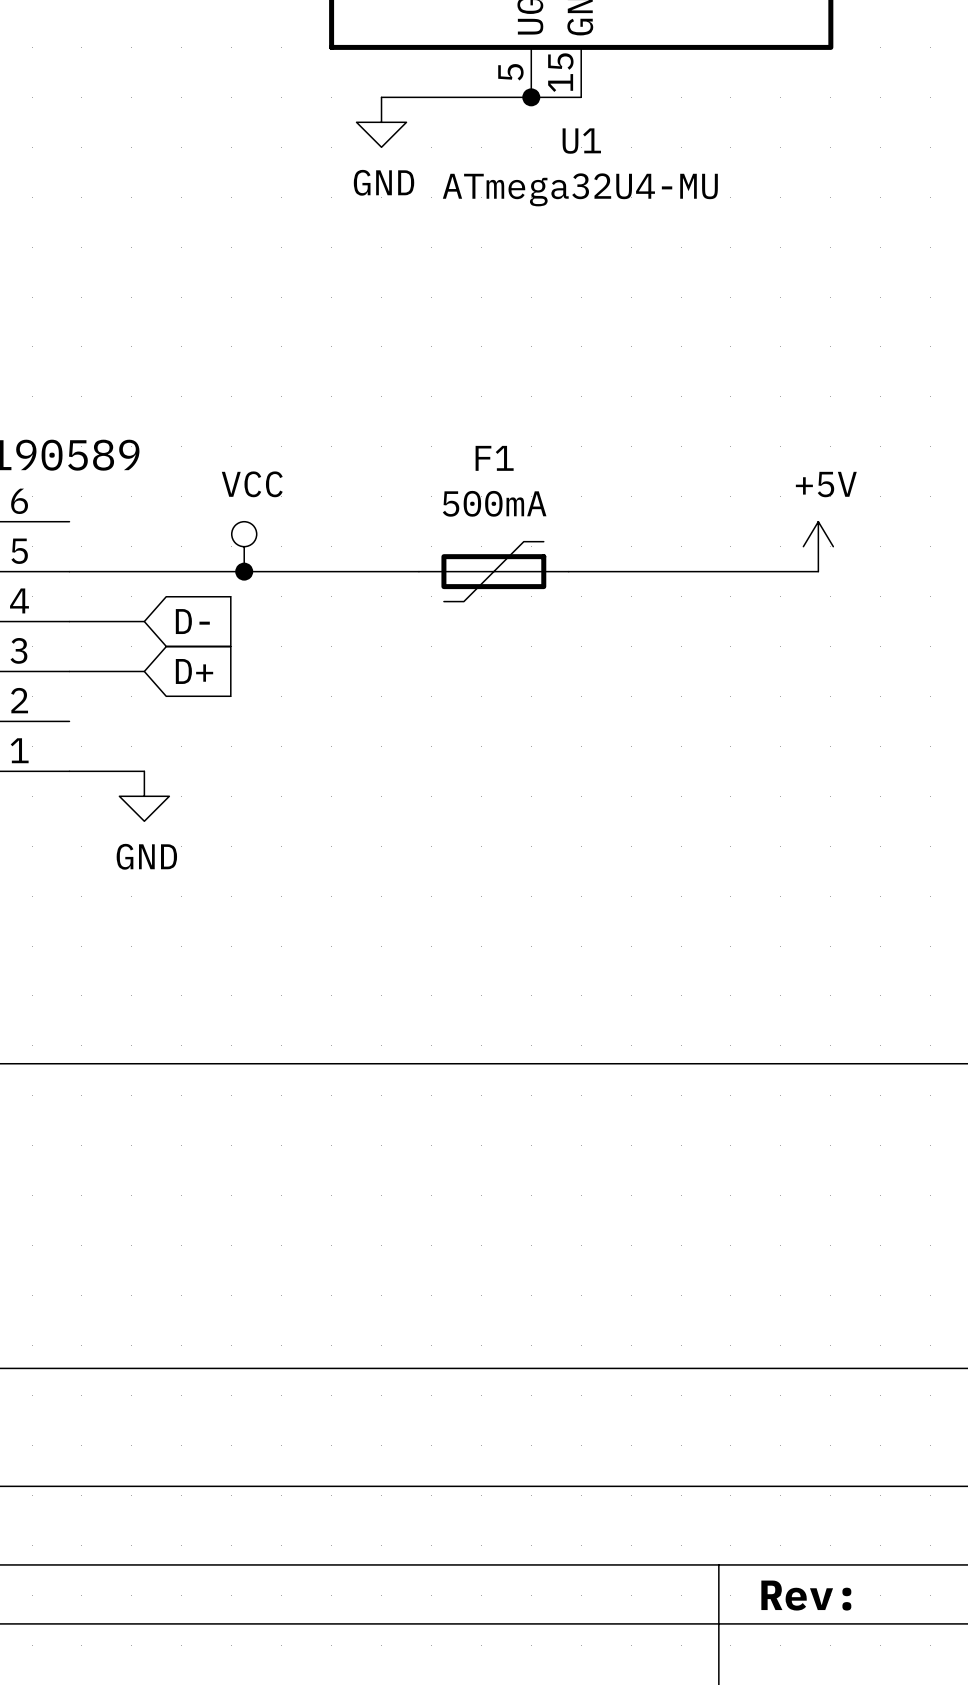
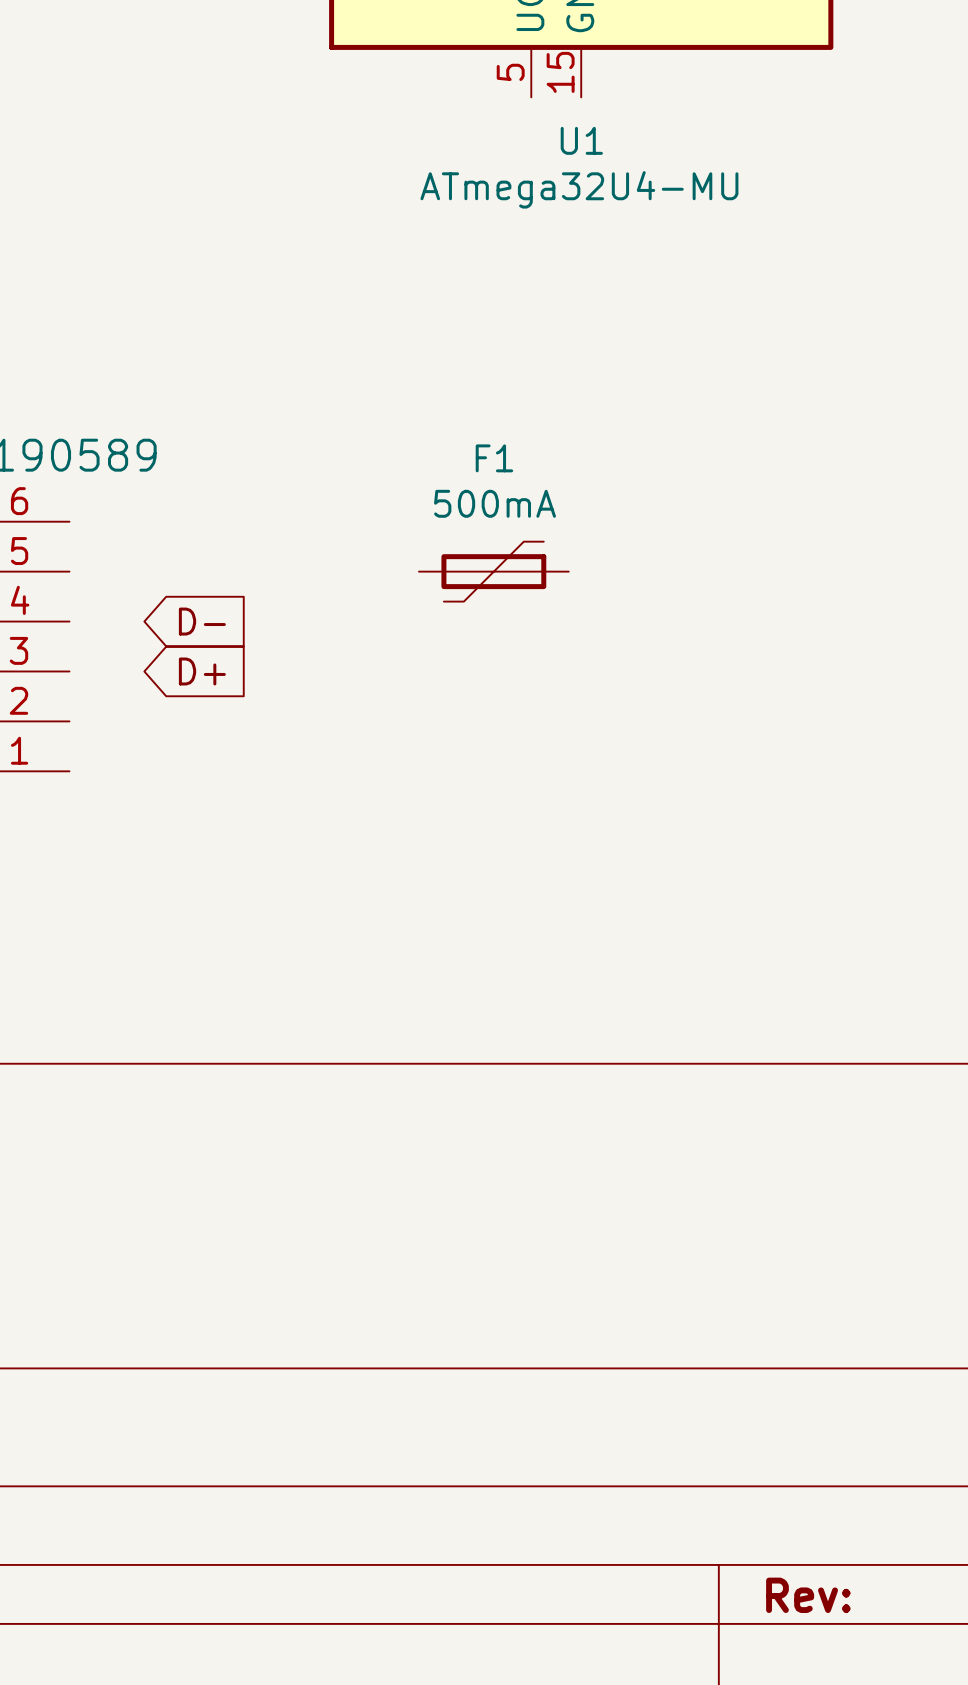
wire: (381, 97) (581, 97) -> none
junction: (531, 97) -> none
power symbol: GND (381, 122) -> none
power symbol: VCC (244, 546) -> none
power symbol: +5V (818, 546) -> none
wire: (69, 571) (418, 571) -> none
junction: (244, 571) -> none
wire: (568, 571) (818, 571) -> none
wire: (69, 621) (144, 621) -> none
wire: (69, 671) (144, 671) -> none
wire: (69, 771) (144, 771) -> none
power symbol: GND (144, 796) -> none

